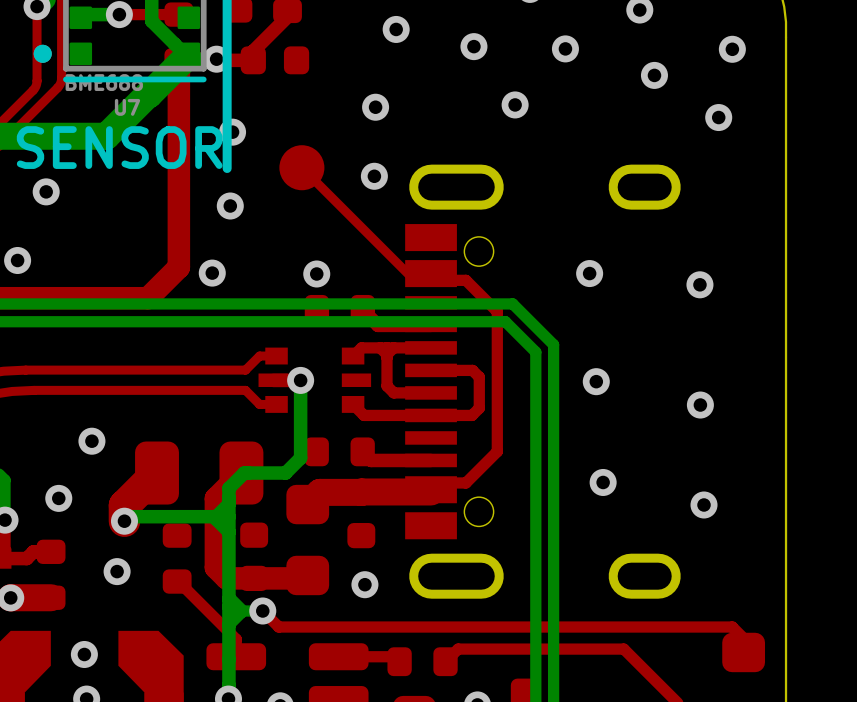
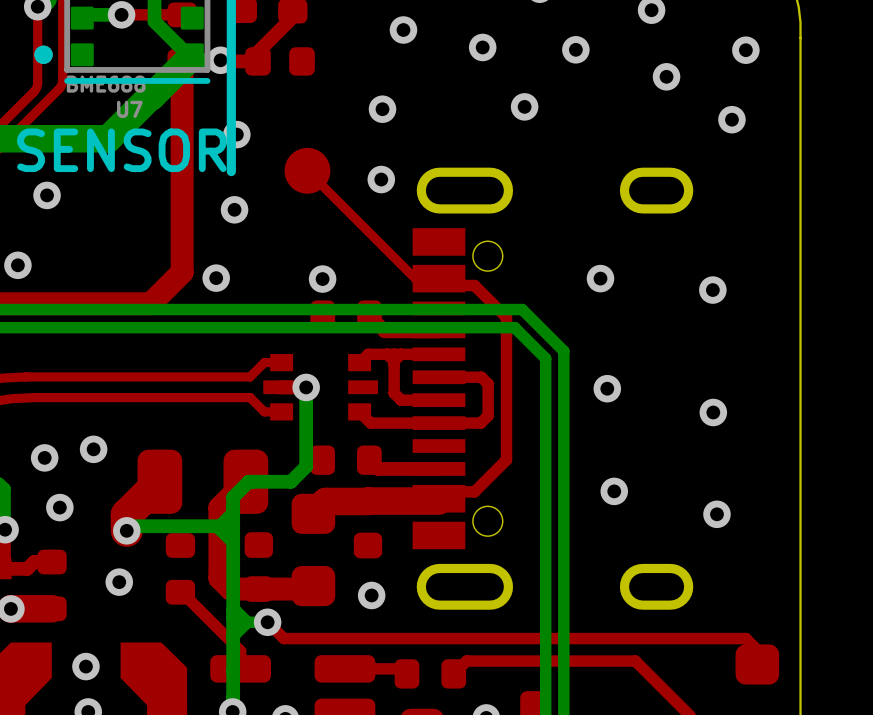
via: none -> (44, 457)

